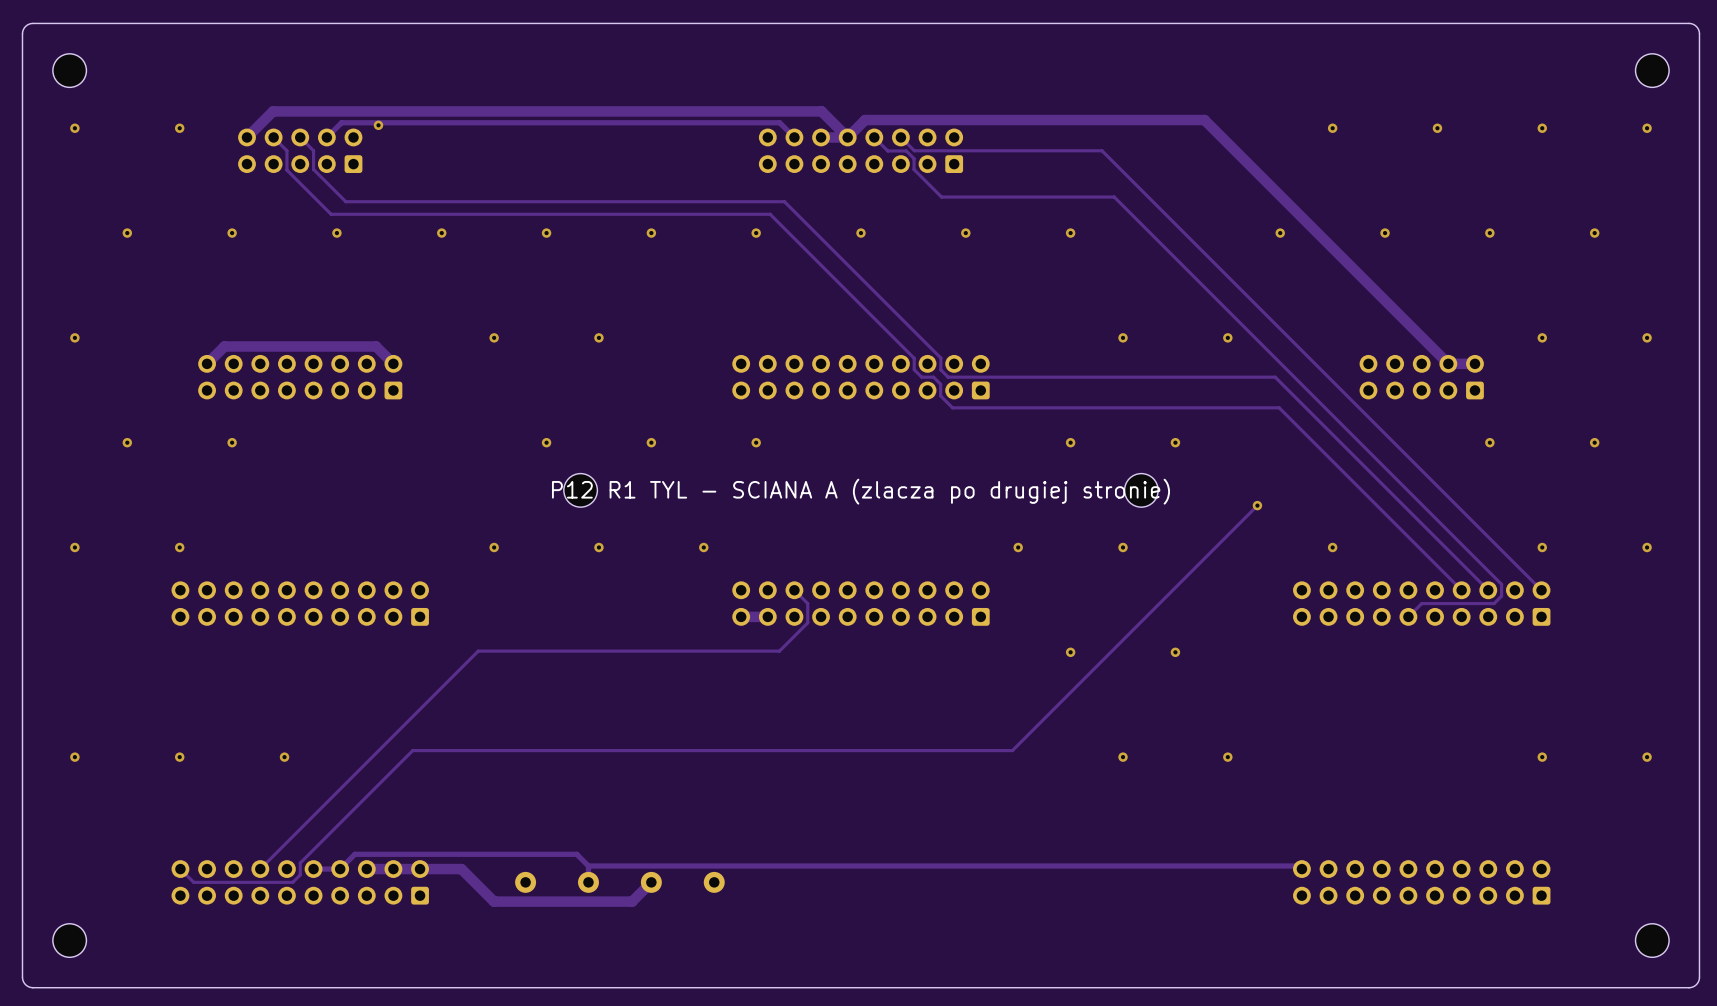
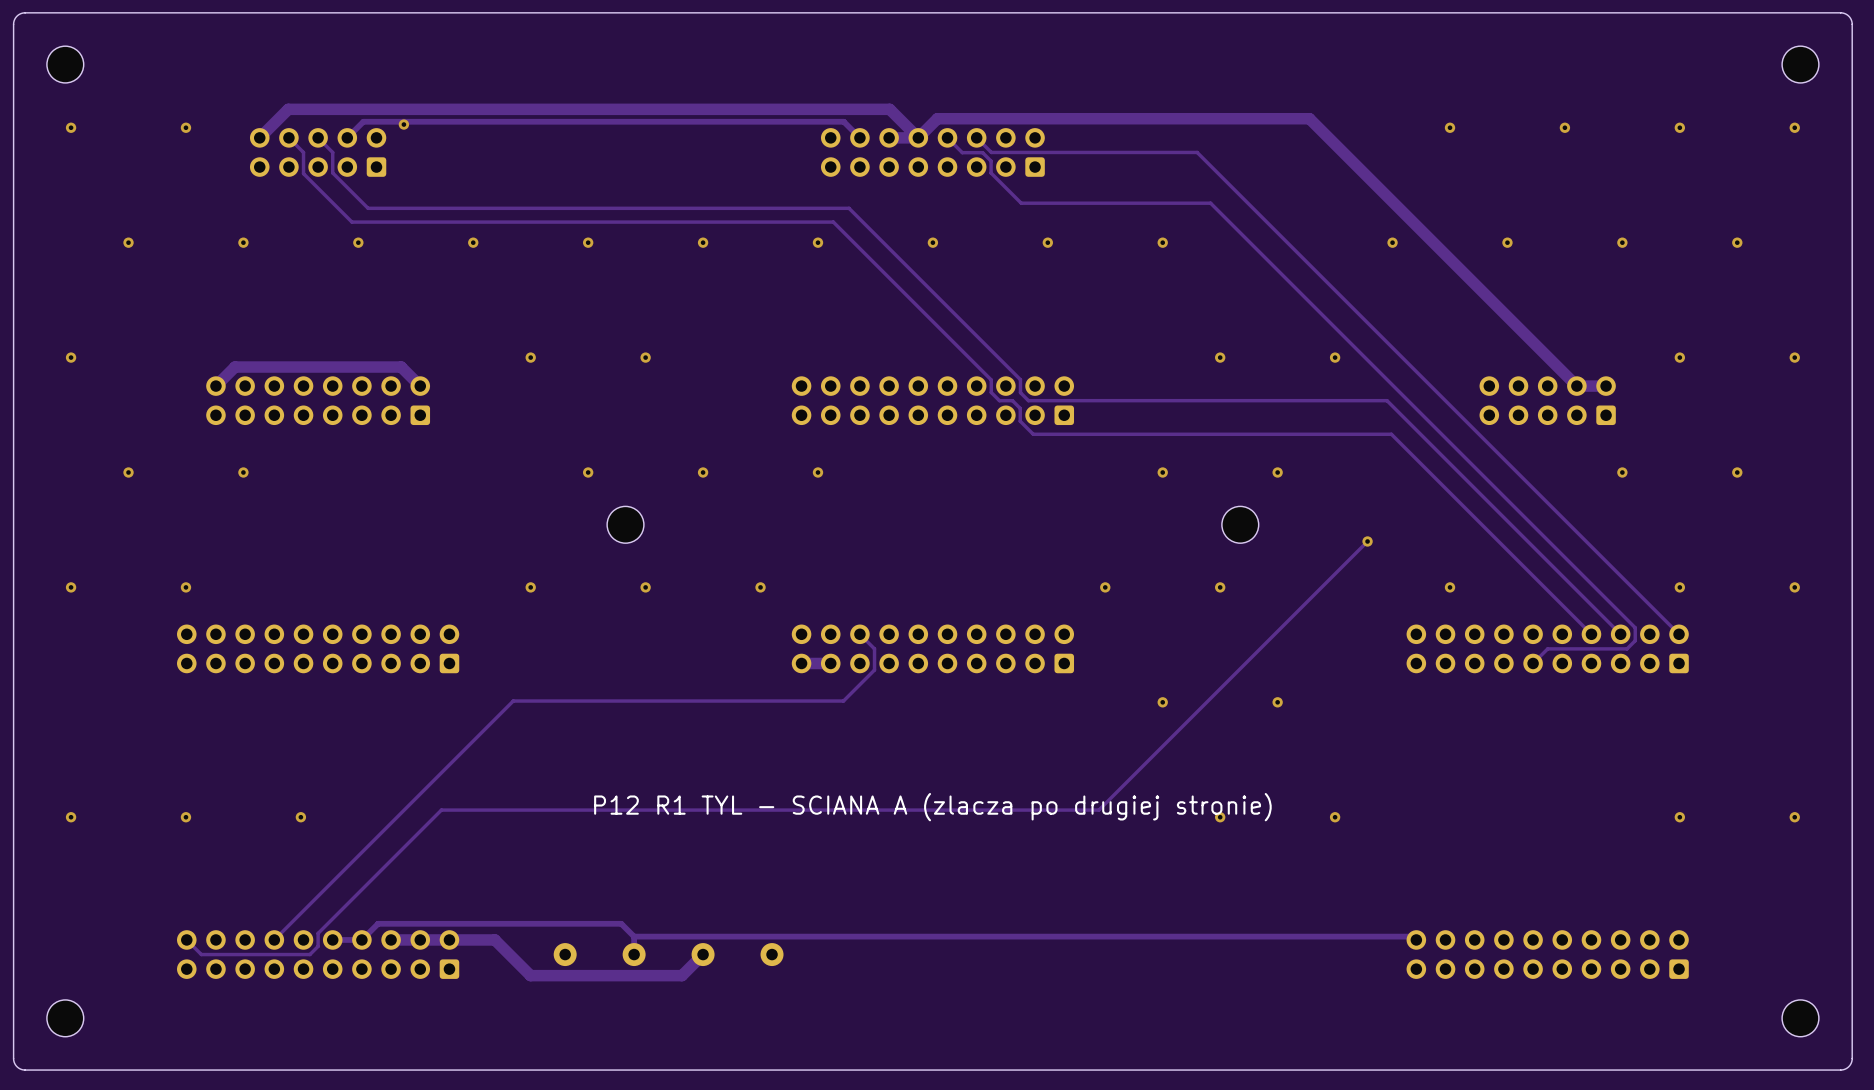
text position: P12 R1 TYL - SCIANA A (zlacza po drugiej stronie) (860, 491) -> P12 R1 TYL - SCIANA A (zlacza po drugiej stronie) (932, 807)

